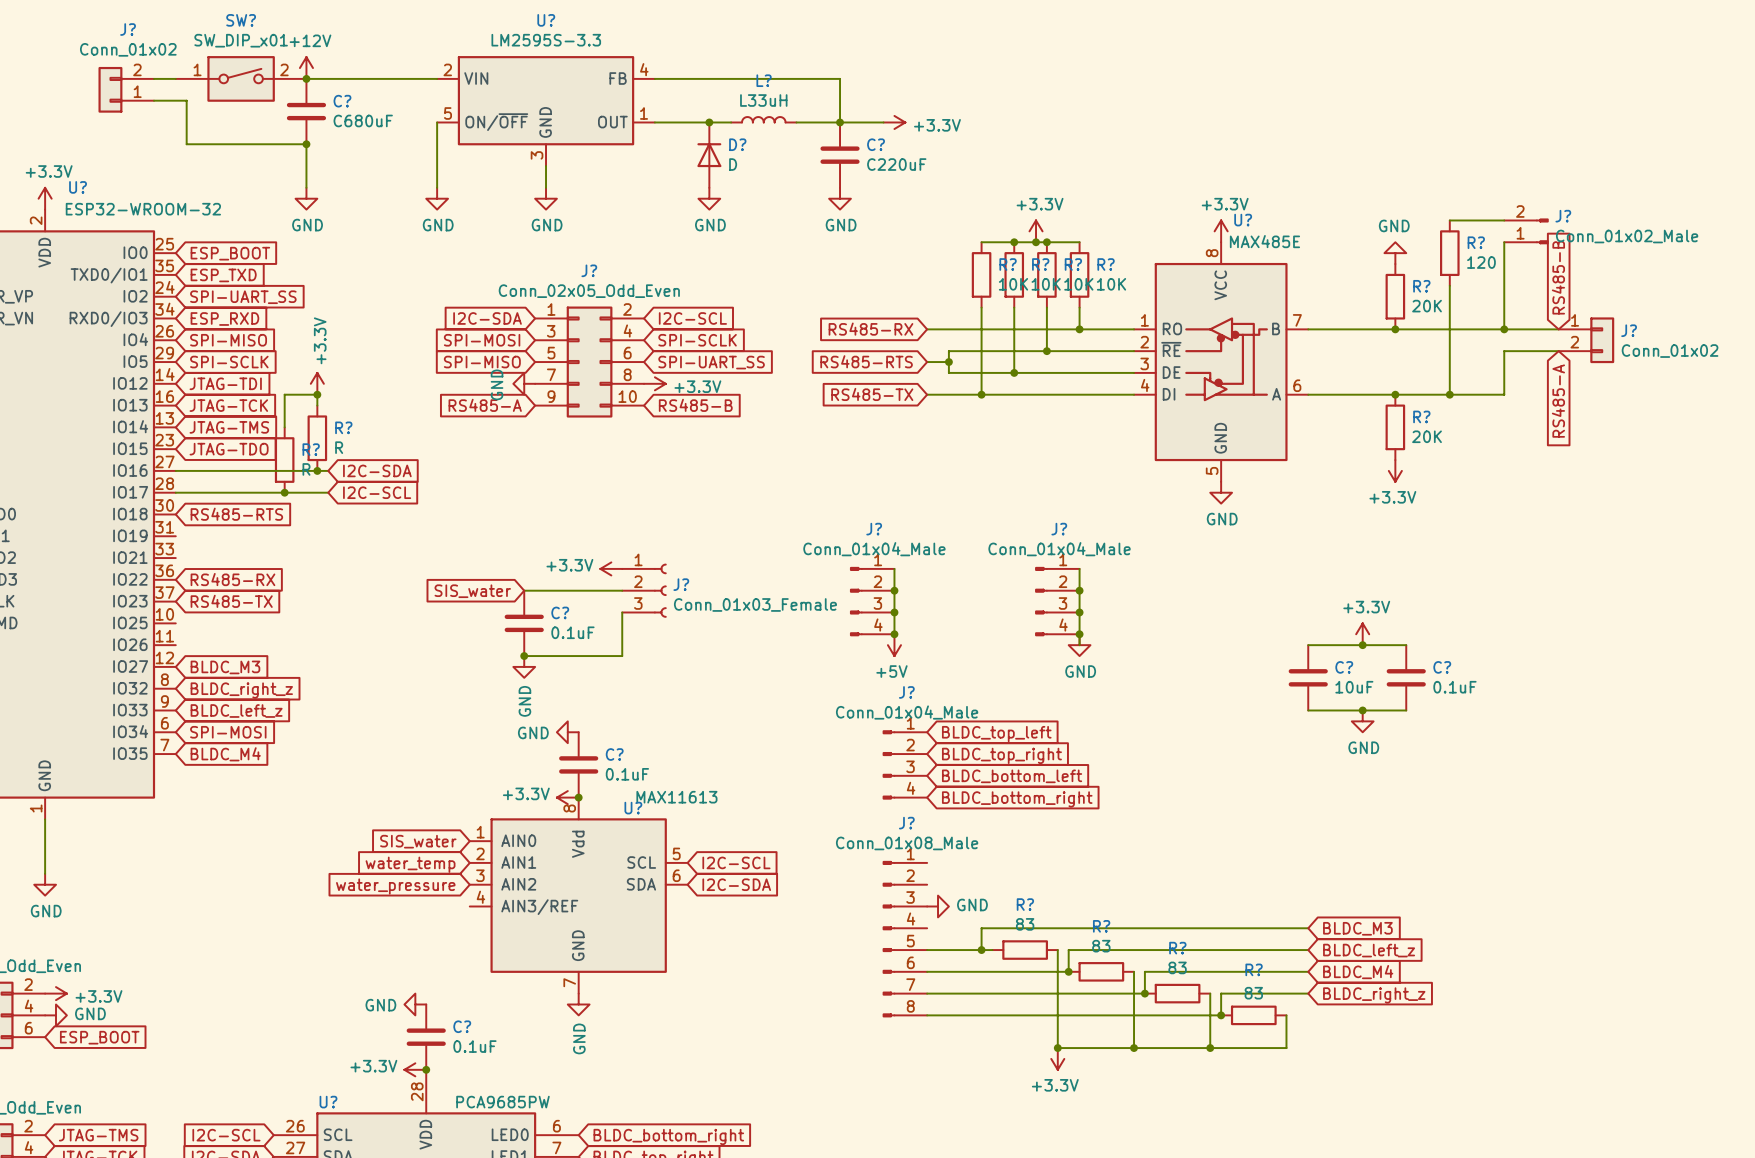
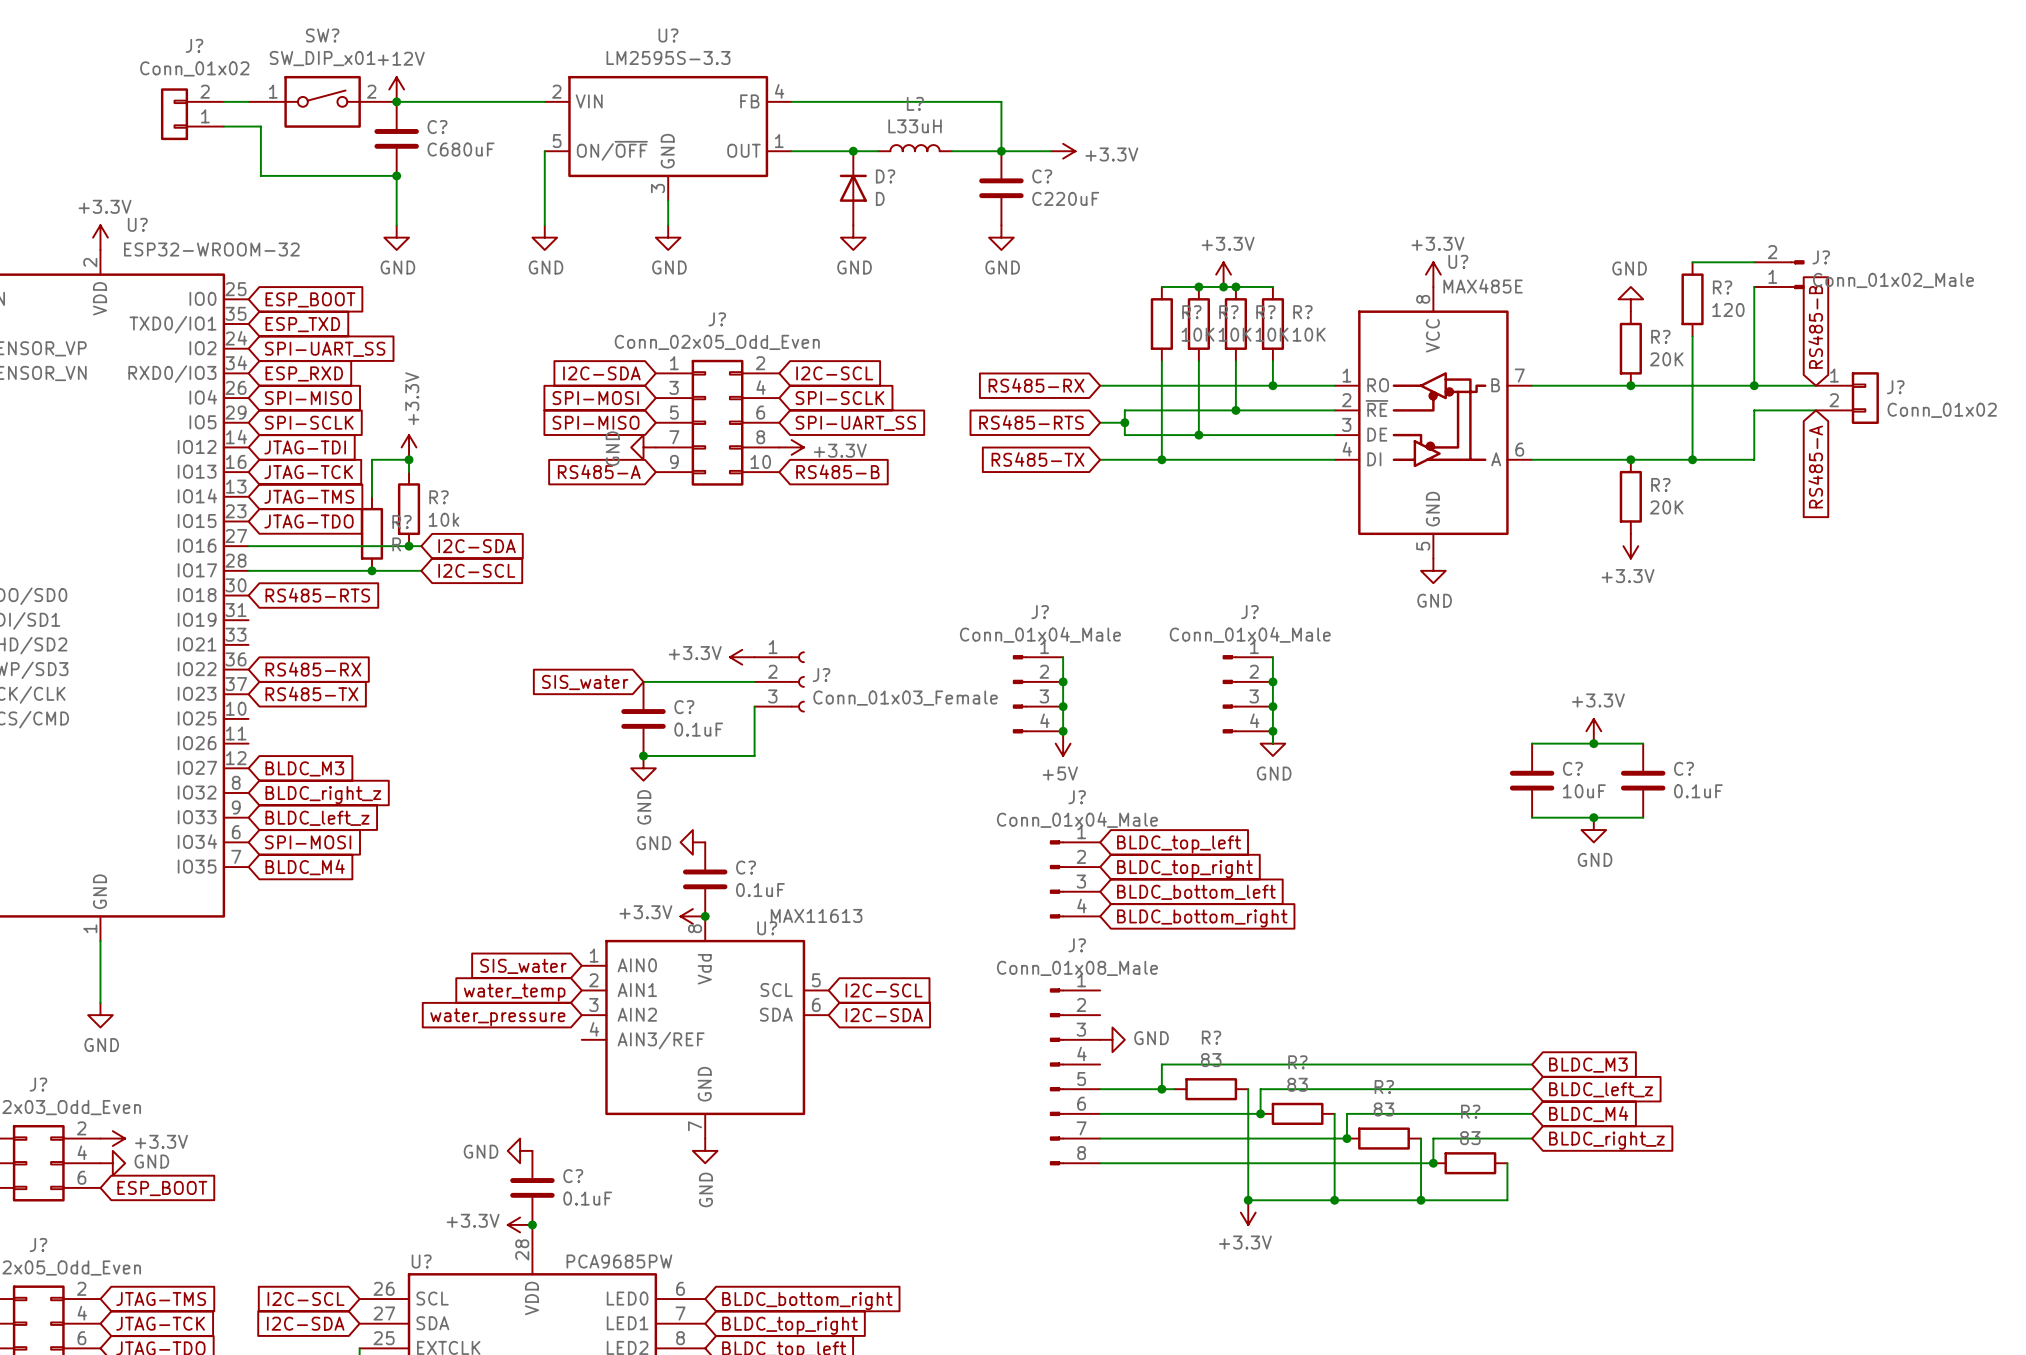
R? value: R (339, 447) -> 10k (444, 519)

